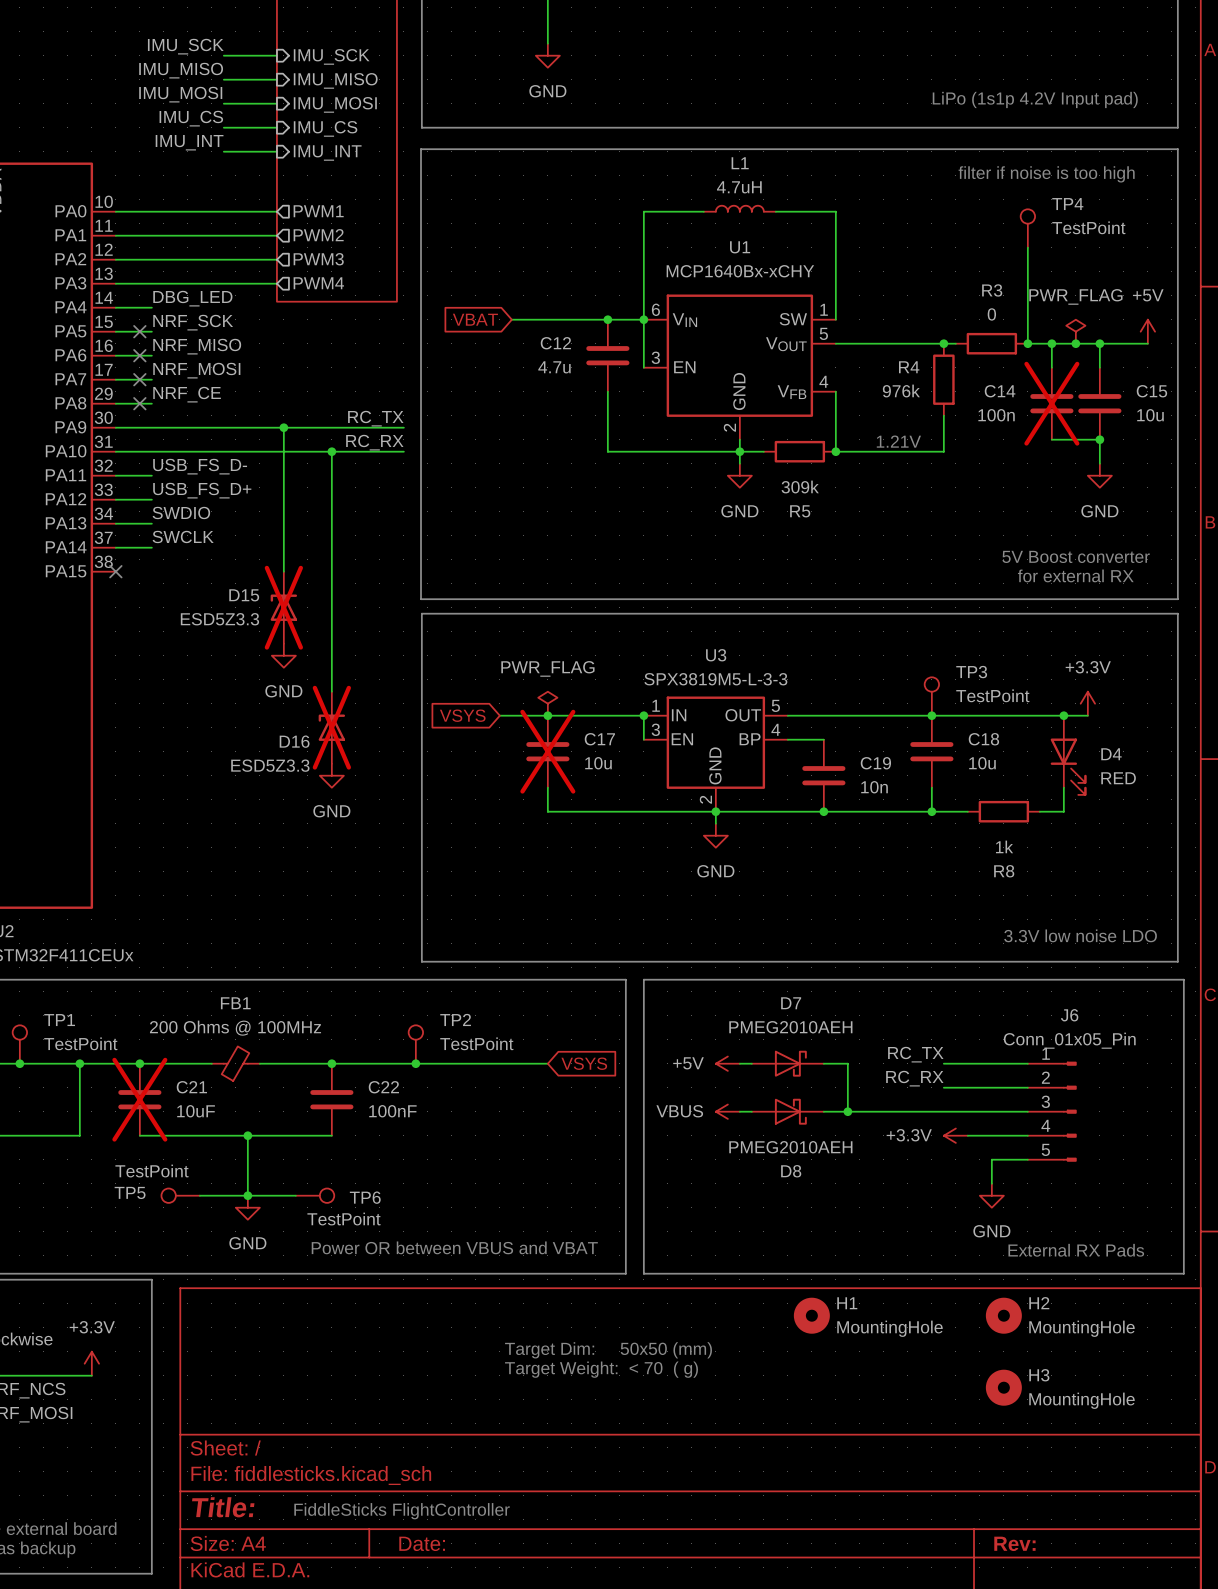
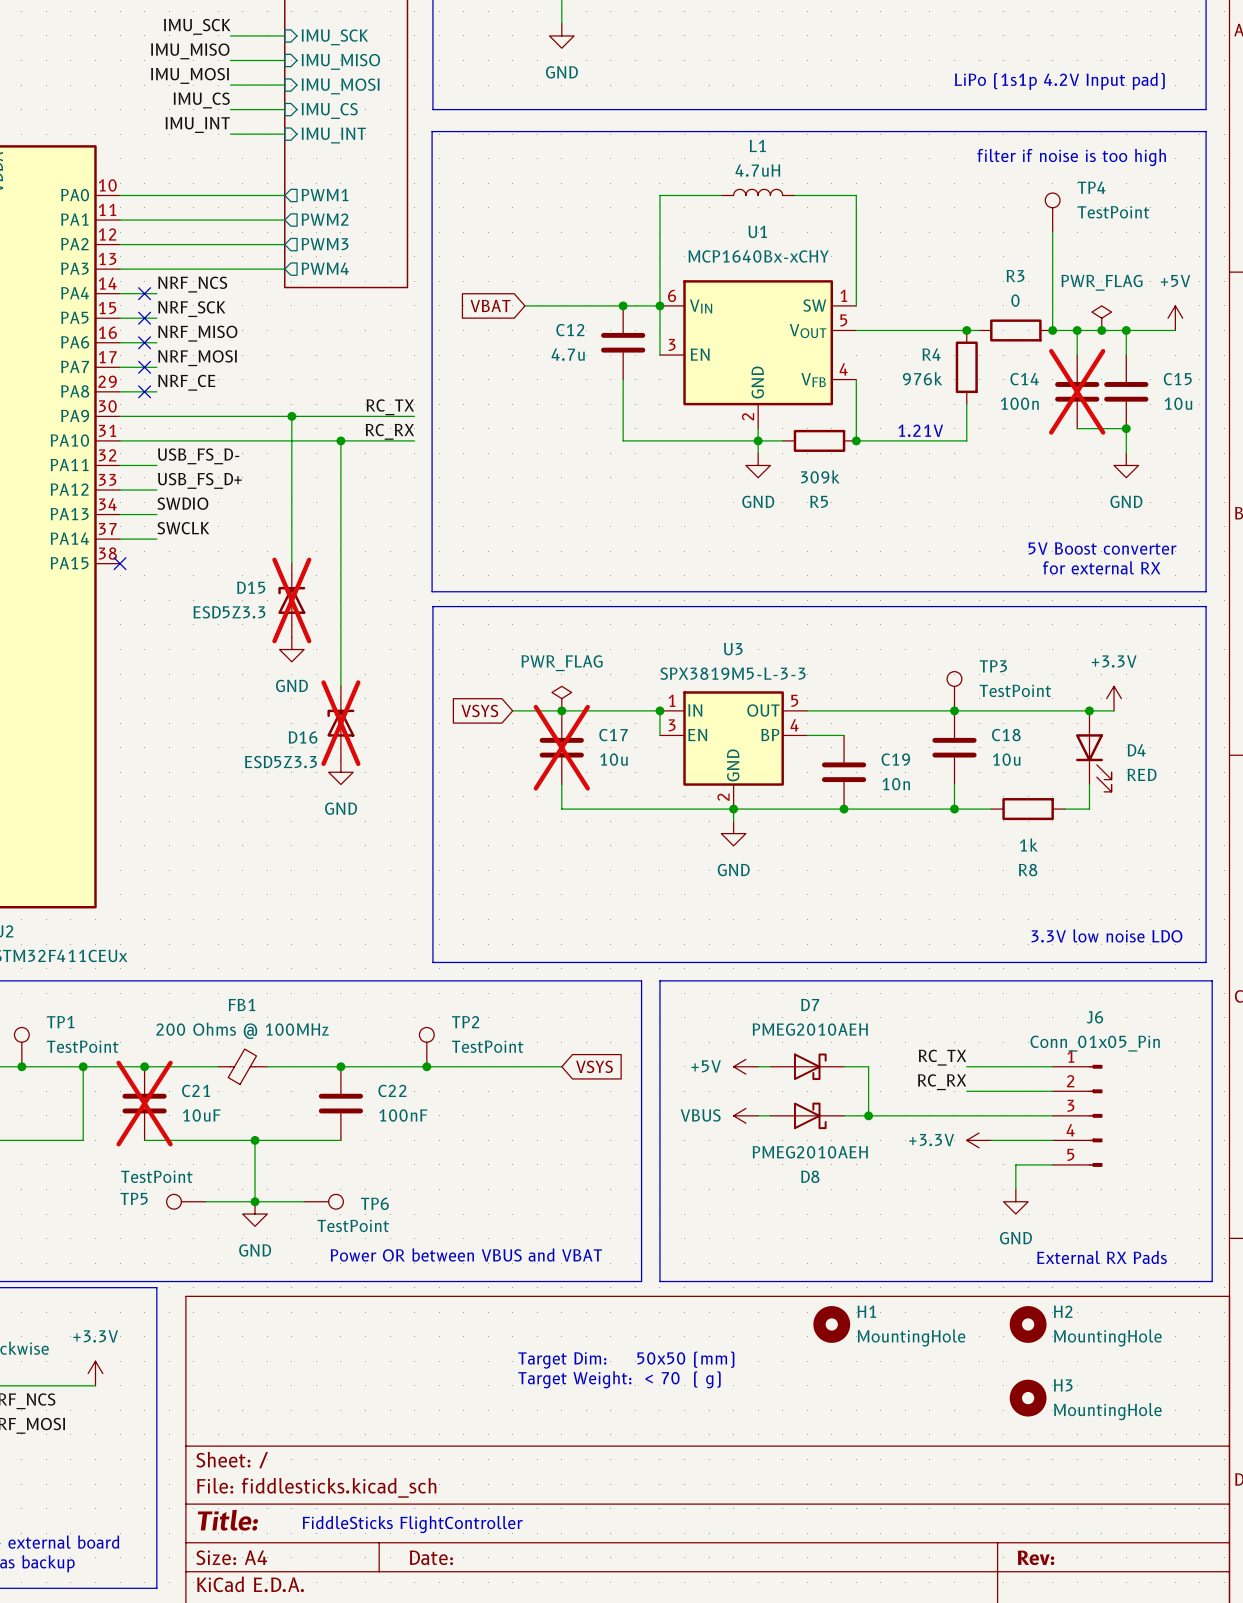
label: DBG_LED (192, 298) -> NRF_NCS (192, 284)
no-connect mark: none -> (144, 293)

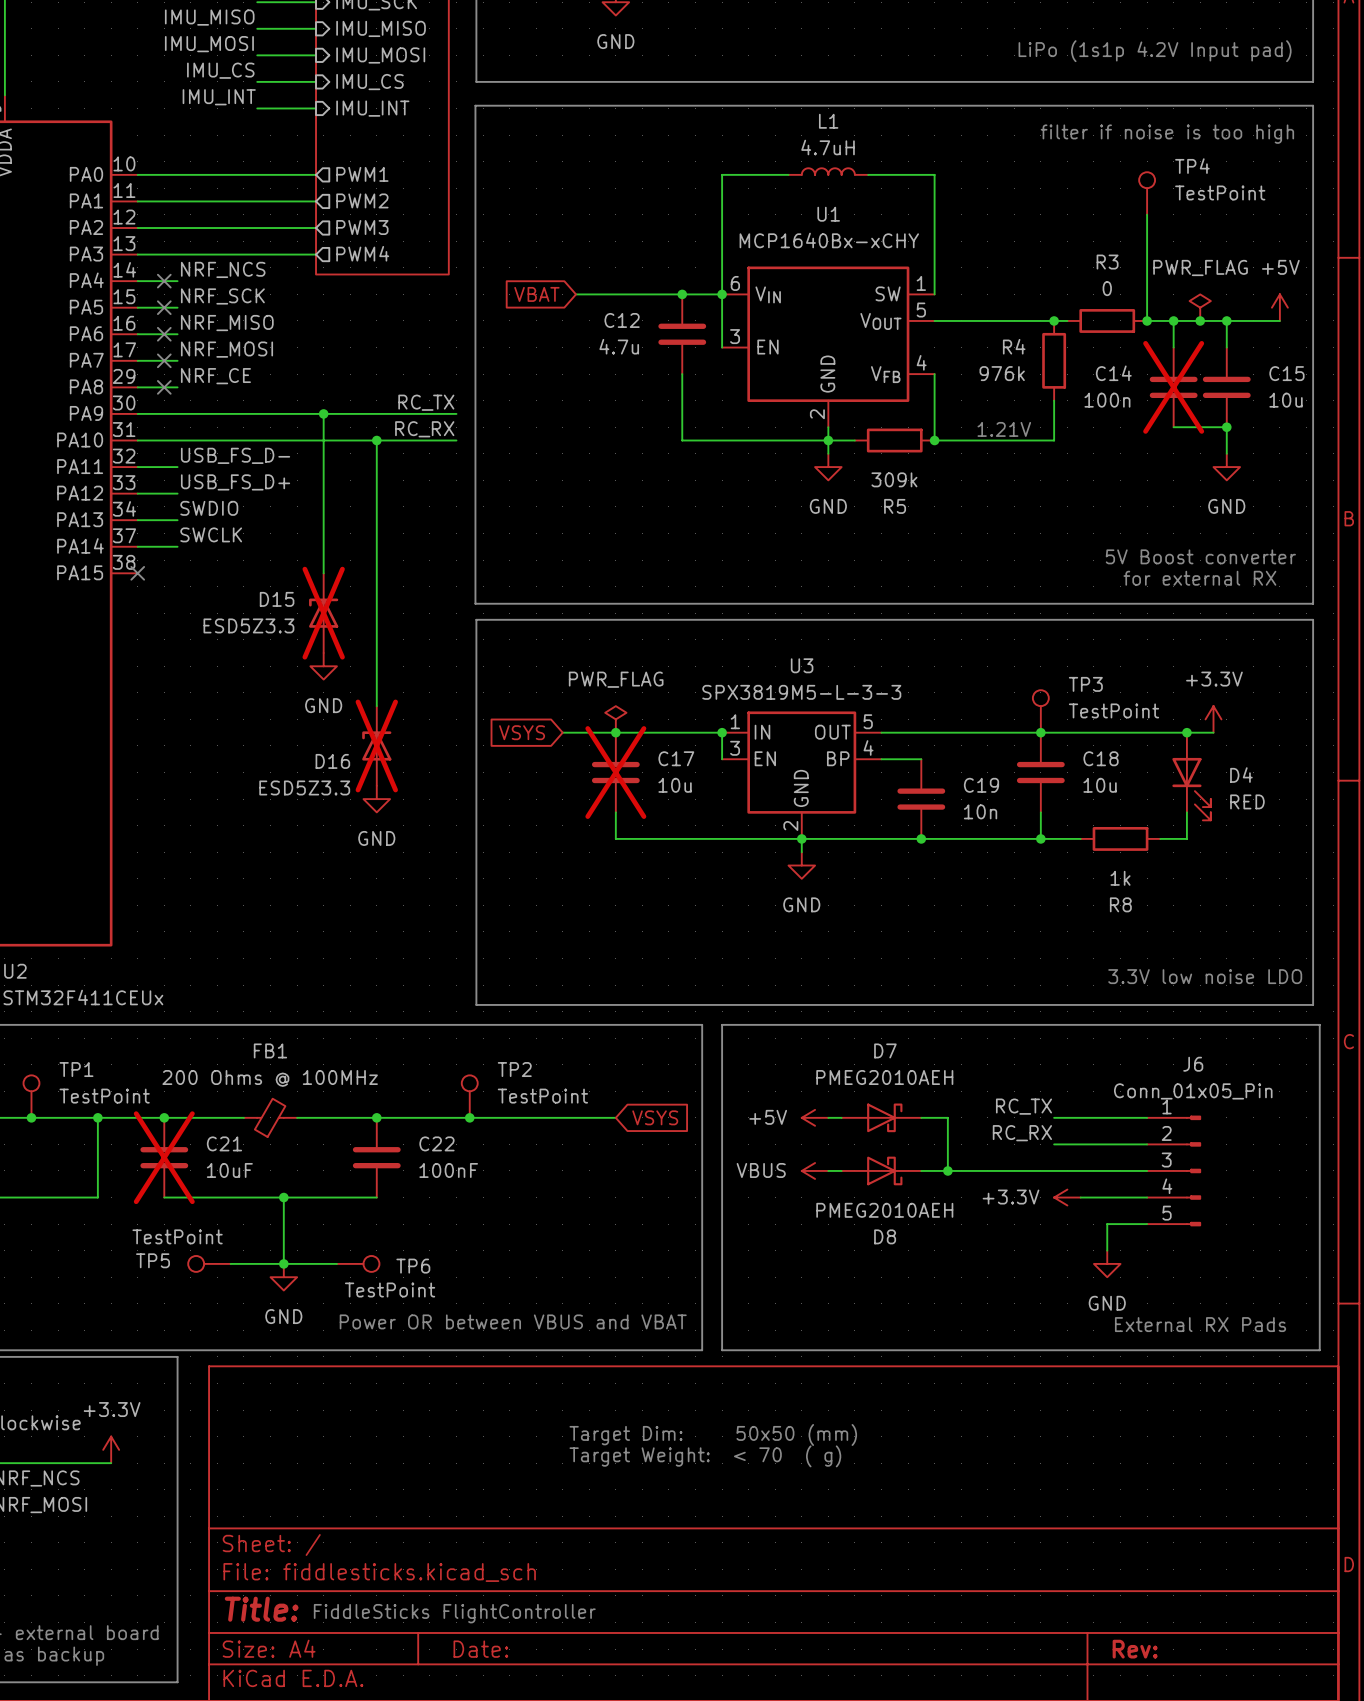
H1: MountingHole (831, 1324) -> none
H2: MountingHole (1028, 1324) -> none
H3: MountingHole (1028, 1398) -> none

